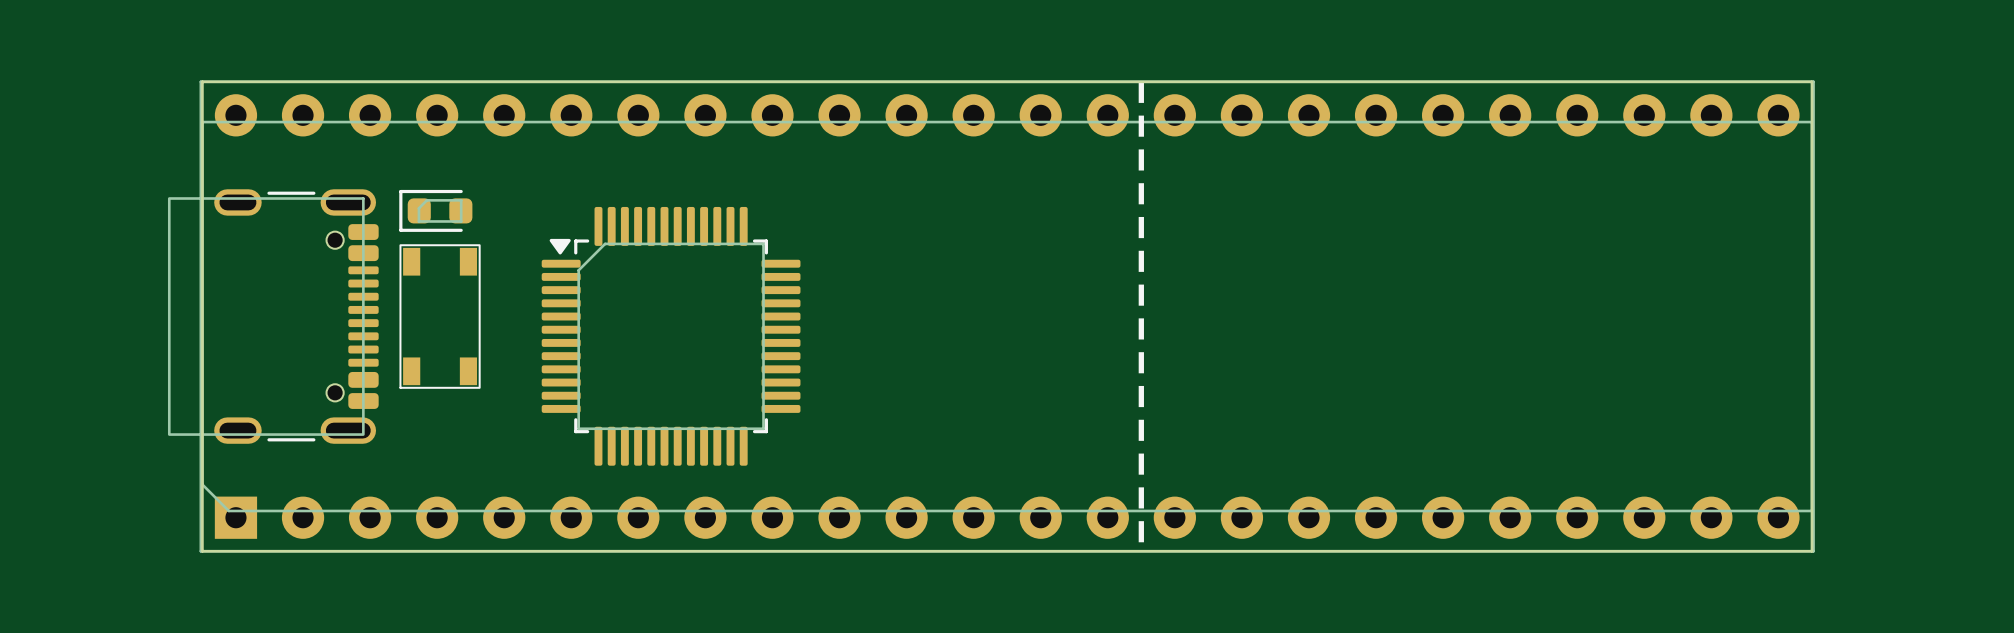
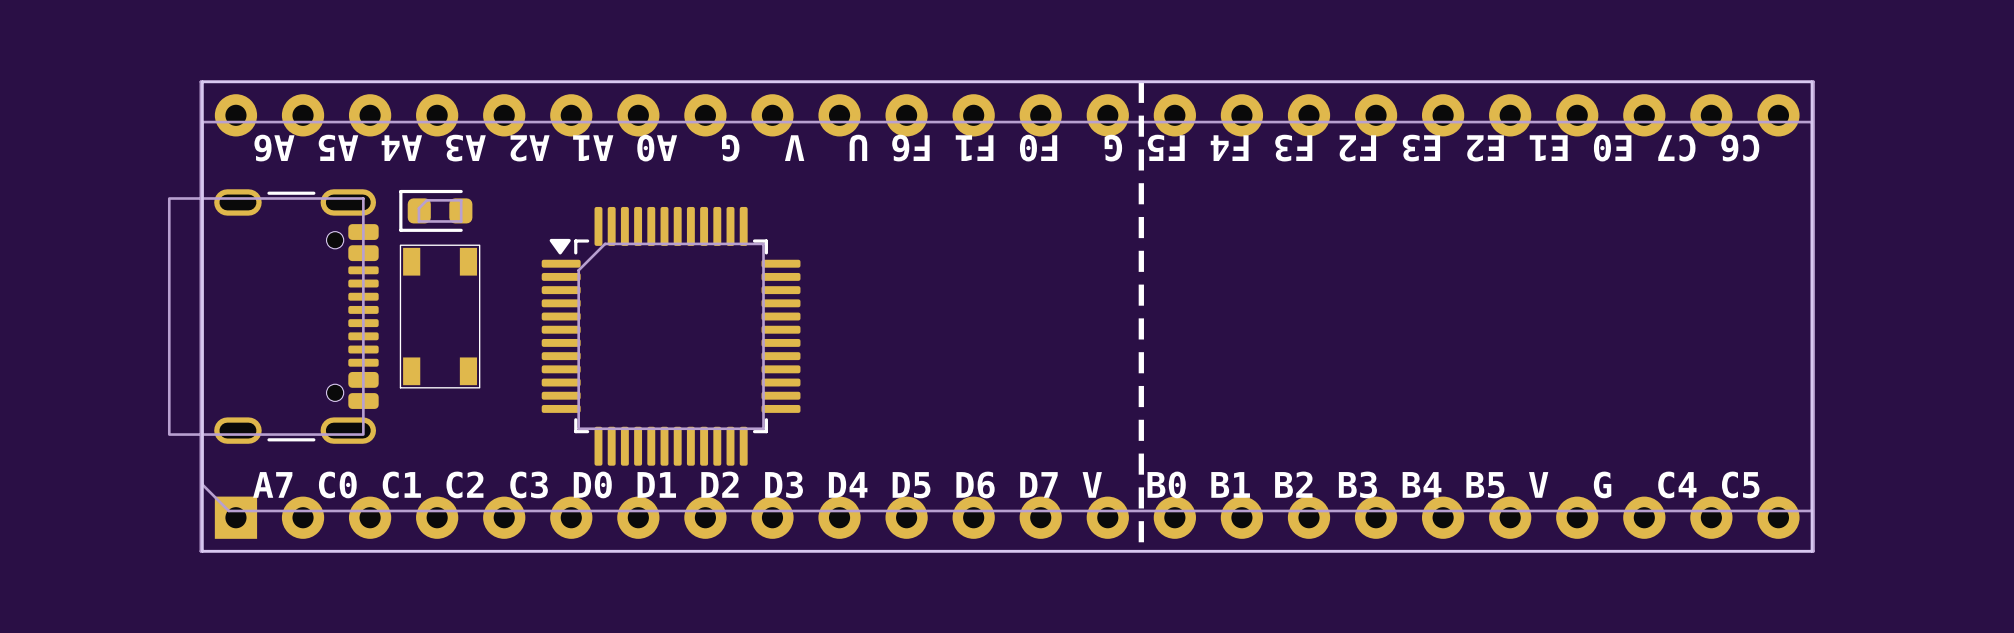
text: none -> C6 C7 E0 E1 E2 E3 F2 F3 F4 F5 G F0 F1 F6 U V G A0 A1 A2 A3 A4 A5 A6 (1006, 148)
text: none -> A7 C0 C1 C2 C3 D0 D1 D2 D3 D4 D5 D6 D7 V B0 B1 B2 B3 B4 B5 V G C4 C5 (1006, 484)

